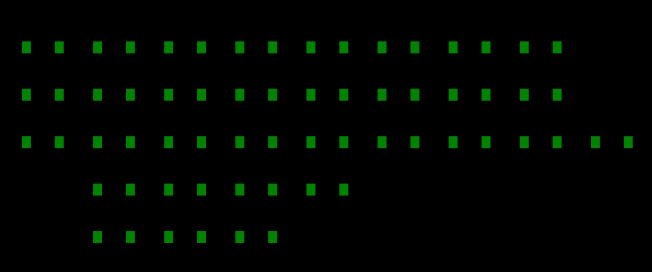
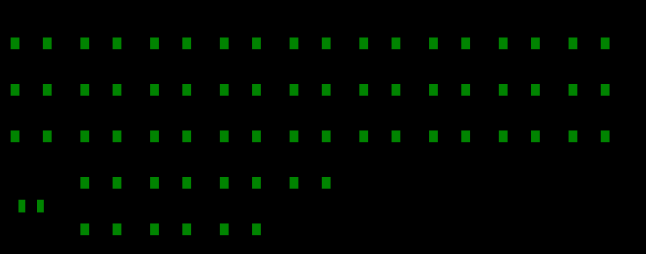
part: none -> (589, 43)
part: none -> (589, 89)
part: none -> (31, 206)

